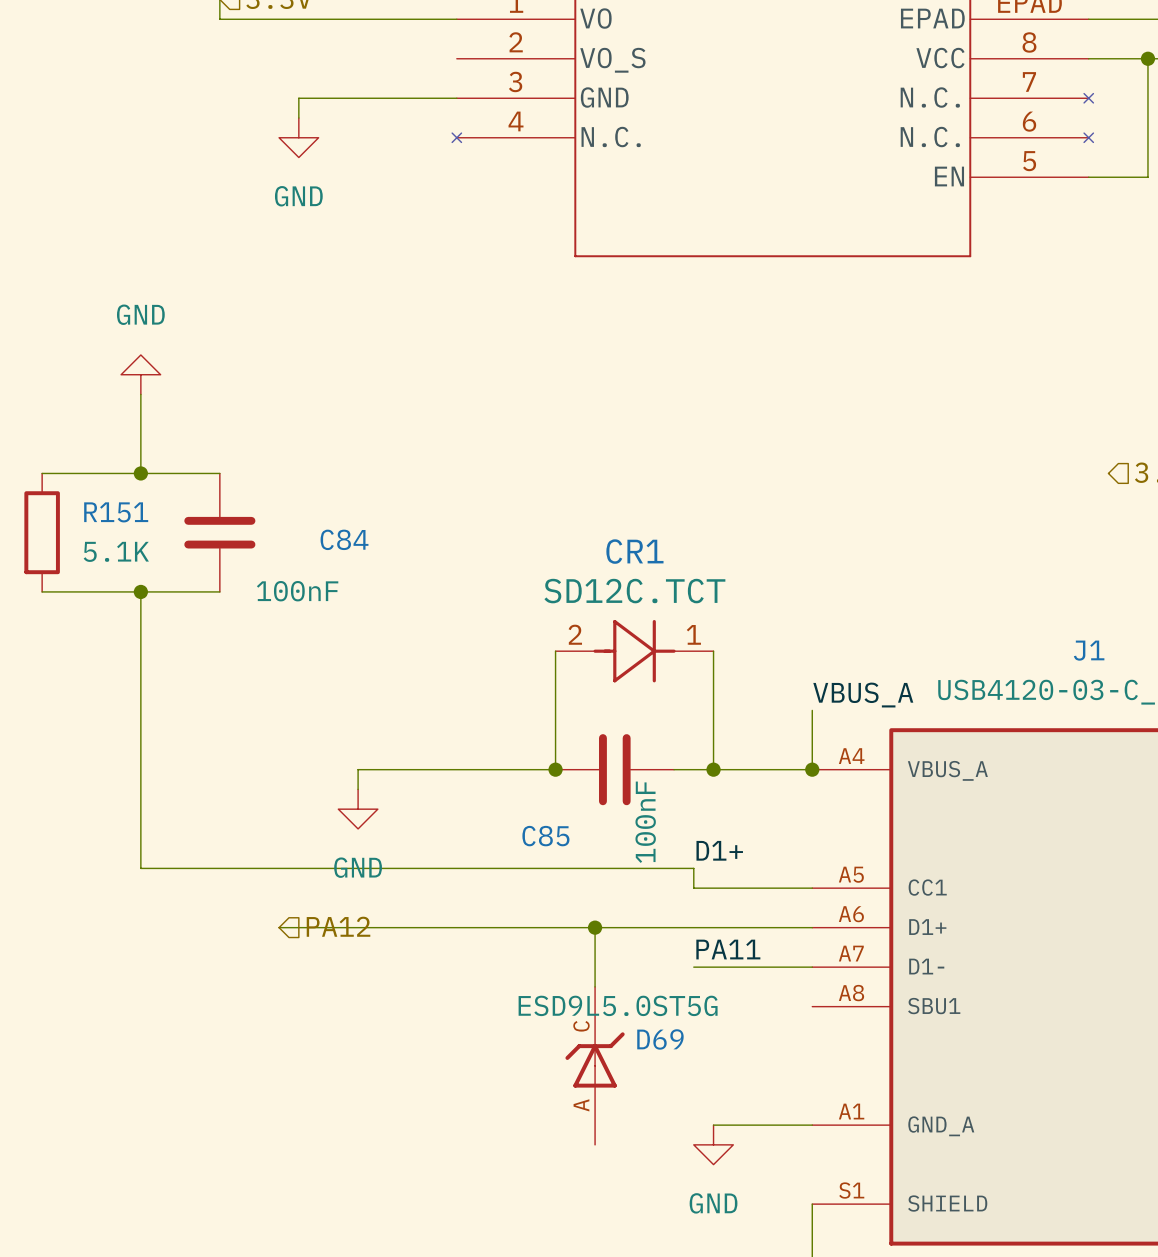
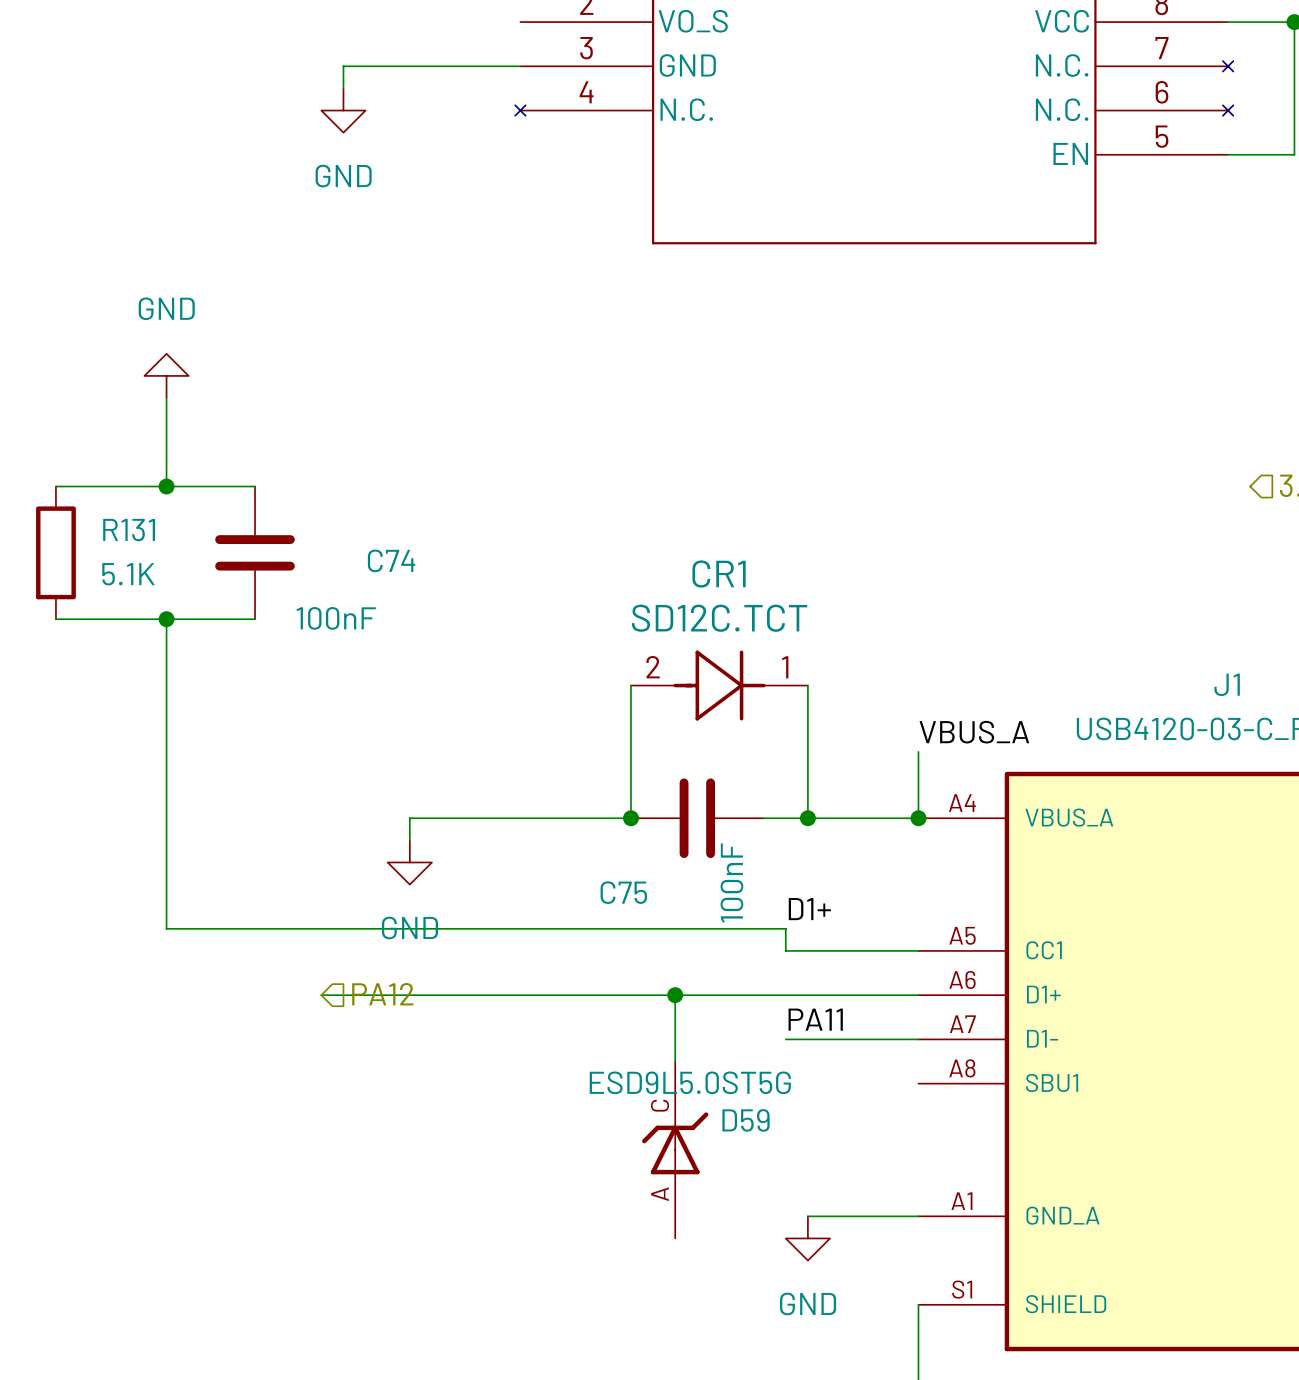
R151 name: R151 (116, 512) -> R131 (129, 530)
C84 name: C84 (344, 539) -> C74 (391, 560)
C85 name: C85 (545, 836) -> C75 (623, 892)
D69 name: D69 (660, 1039) -> D59 (746, 1120)

